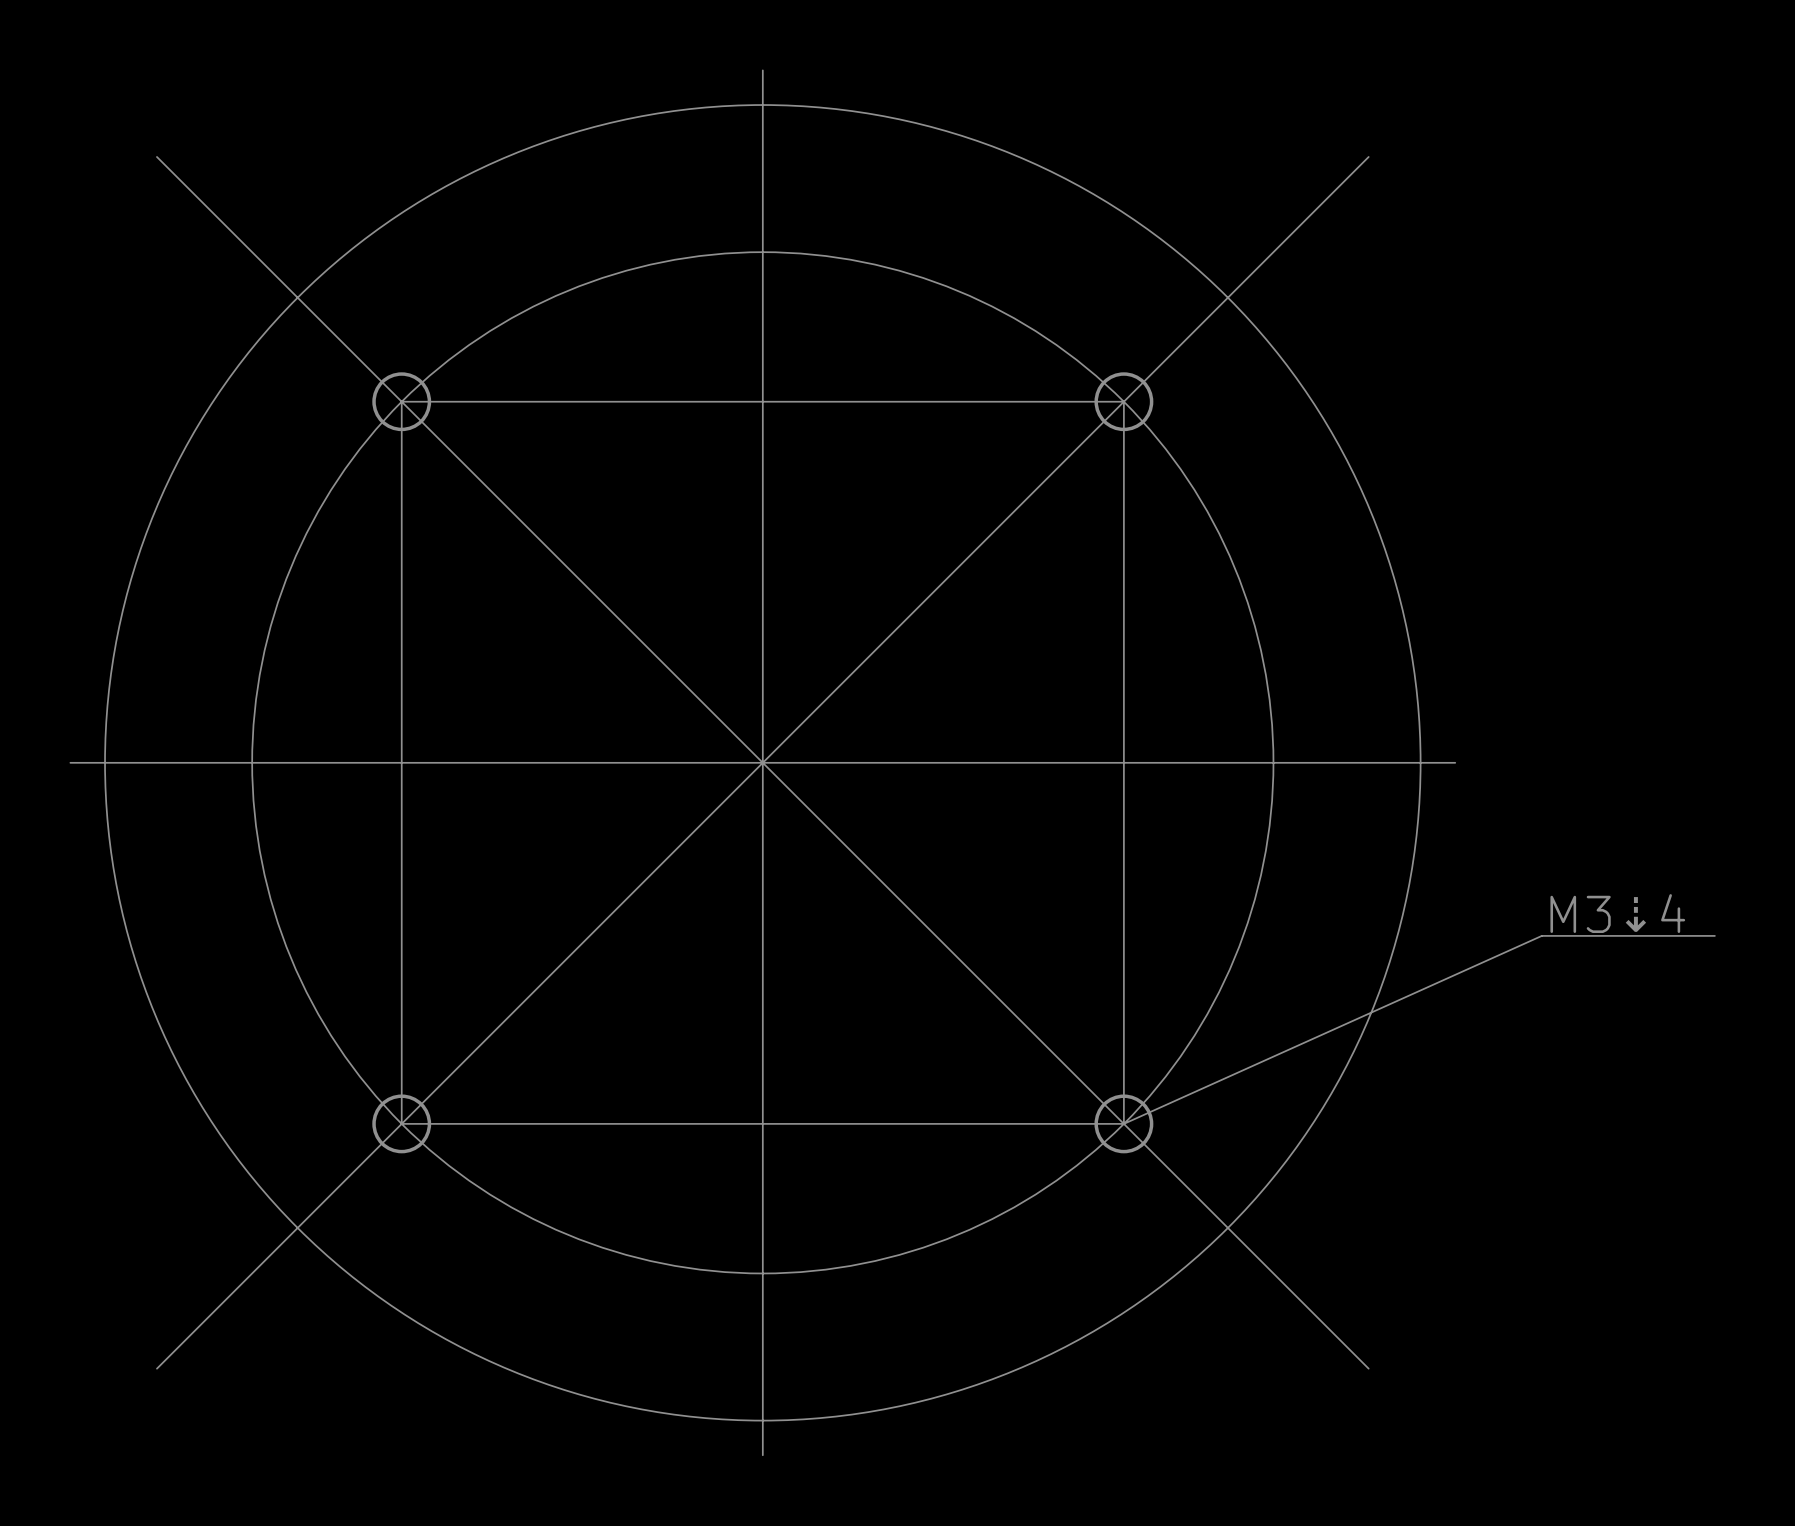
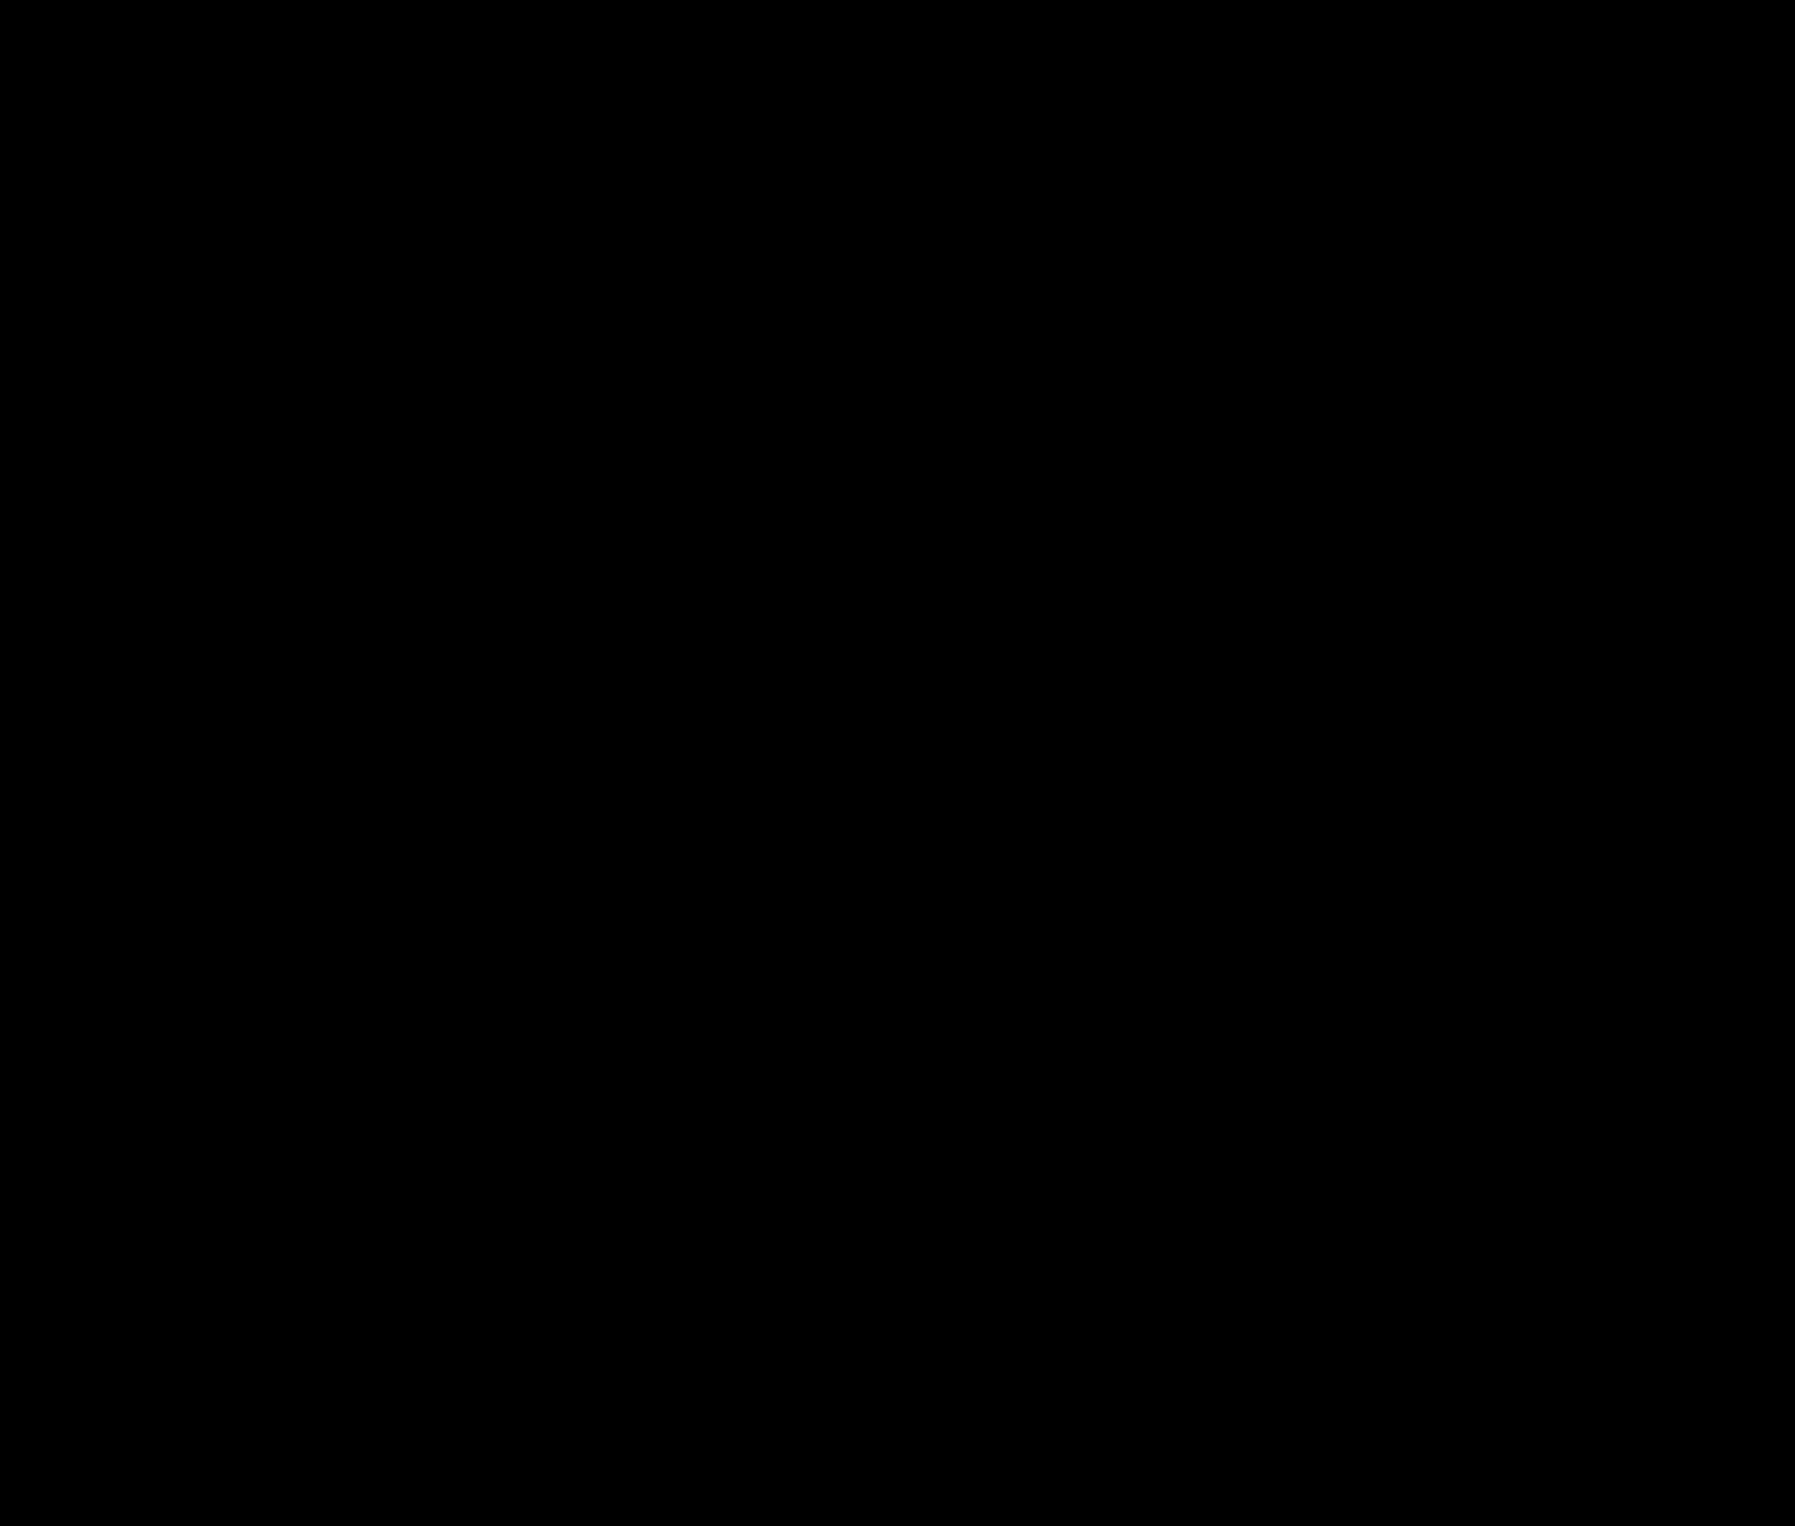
line: (762, 70) (762, 1455) -> none
drawing: [104, 104, 1422, 1422] -> none
line: (156, 156) (1368, 1368) -> none
line: (1368, 156) (156, 1368) -> none
line: (70, 762) (1455, 762) -> none
text: M3⇣4 (1617, 913) -> none
line: (1714, 935) (1541, 935) (1123, 1123) -> none
line: (1123, 1123) (401, 1123) (401, 401) (1123, 401) (1123, 1123) -> none

